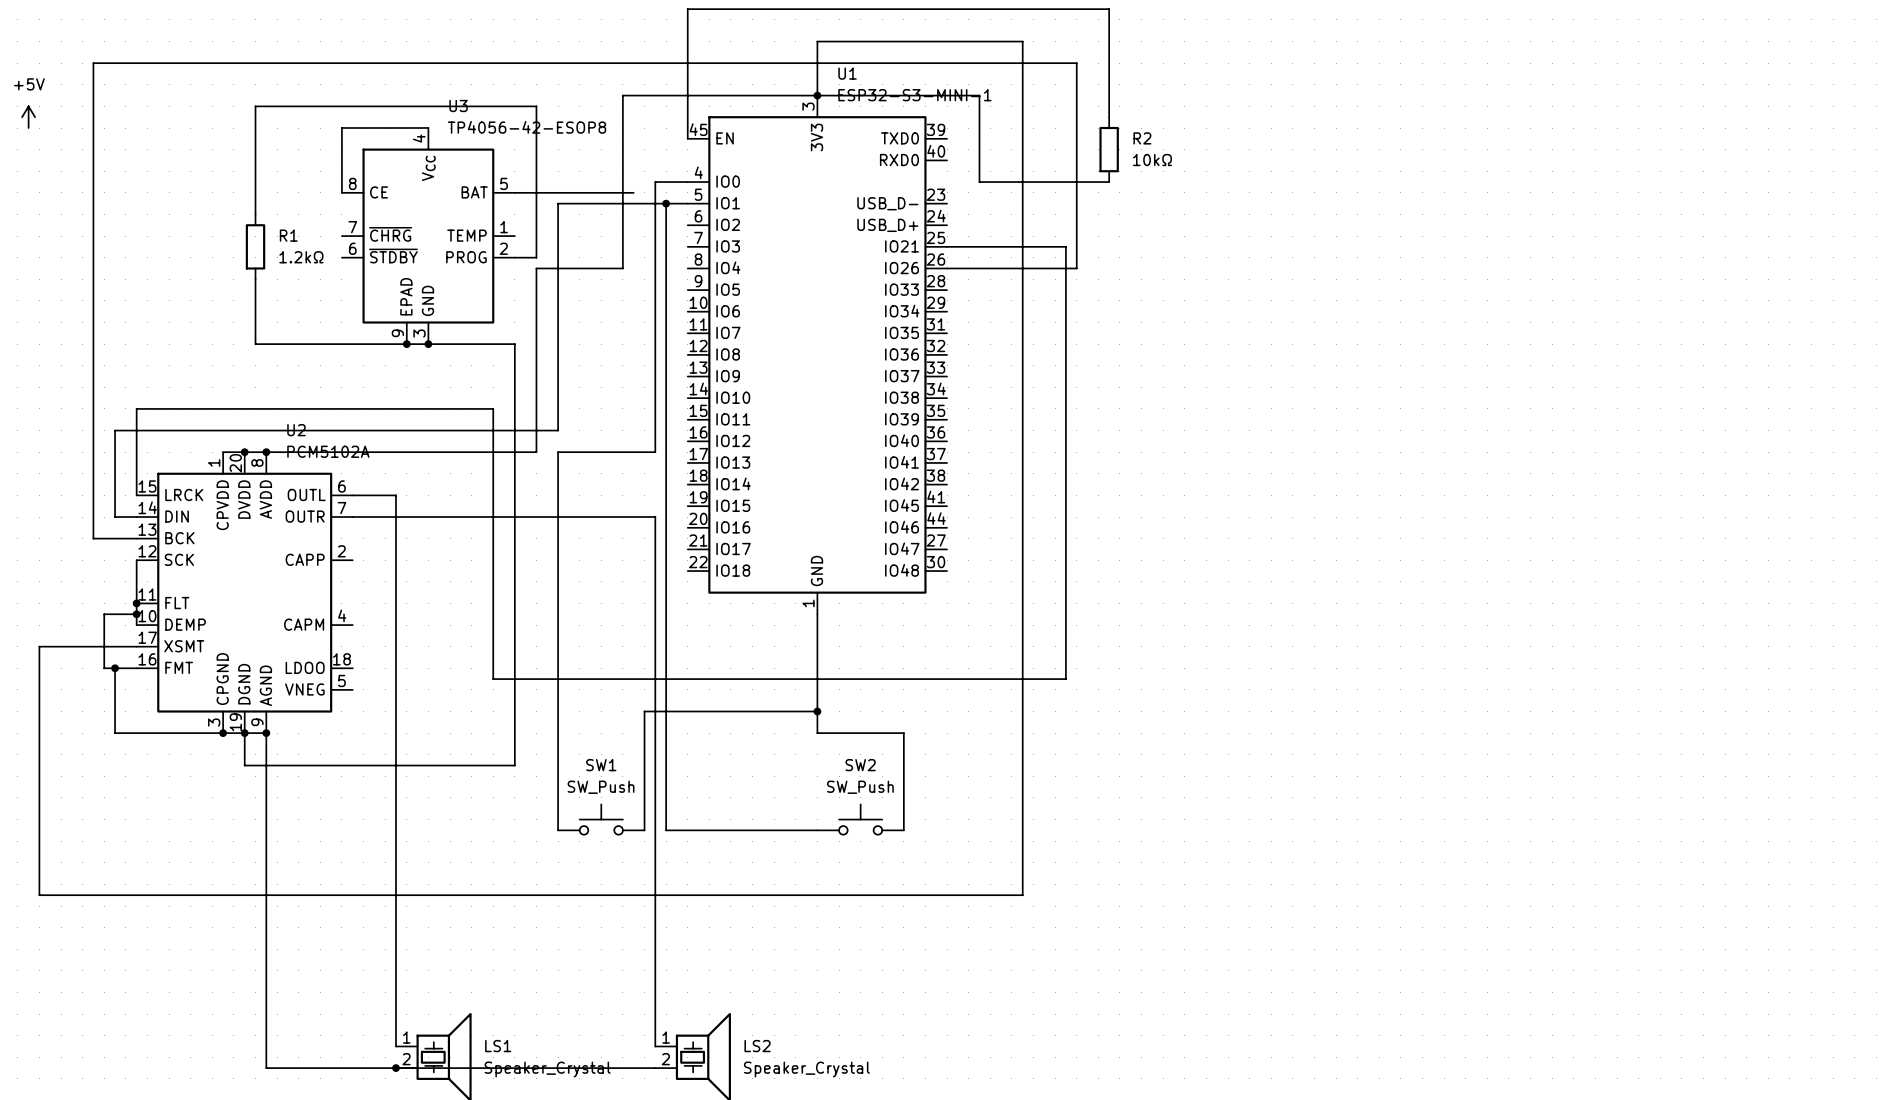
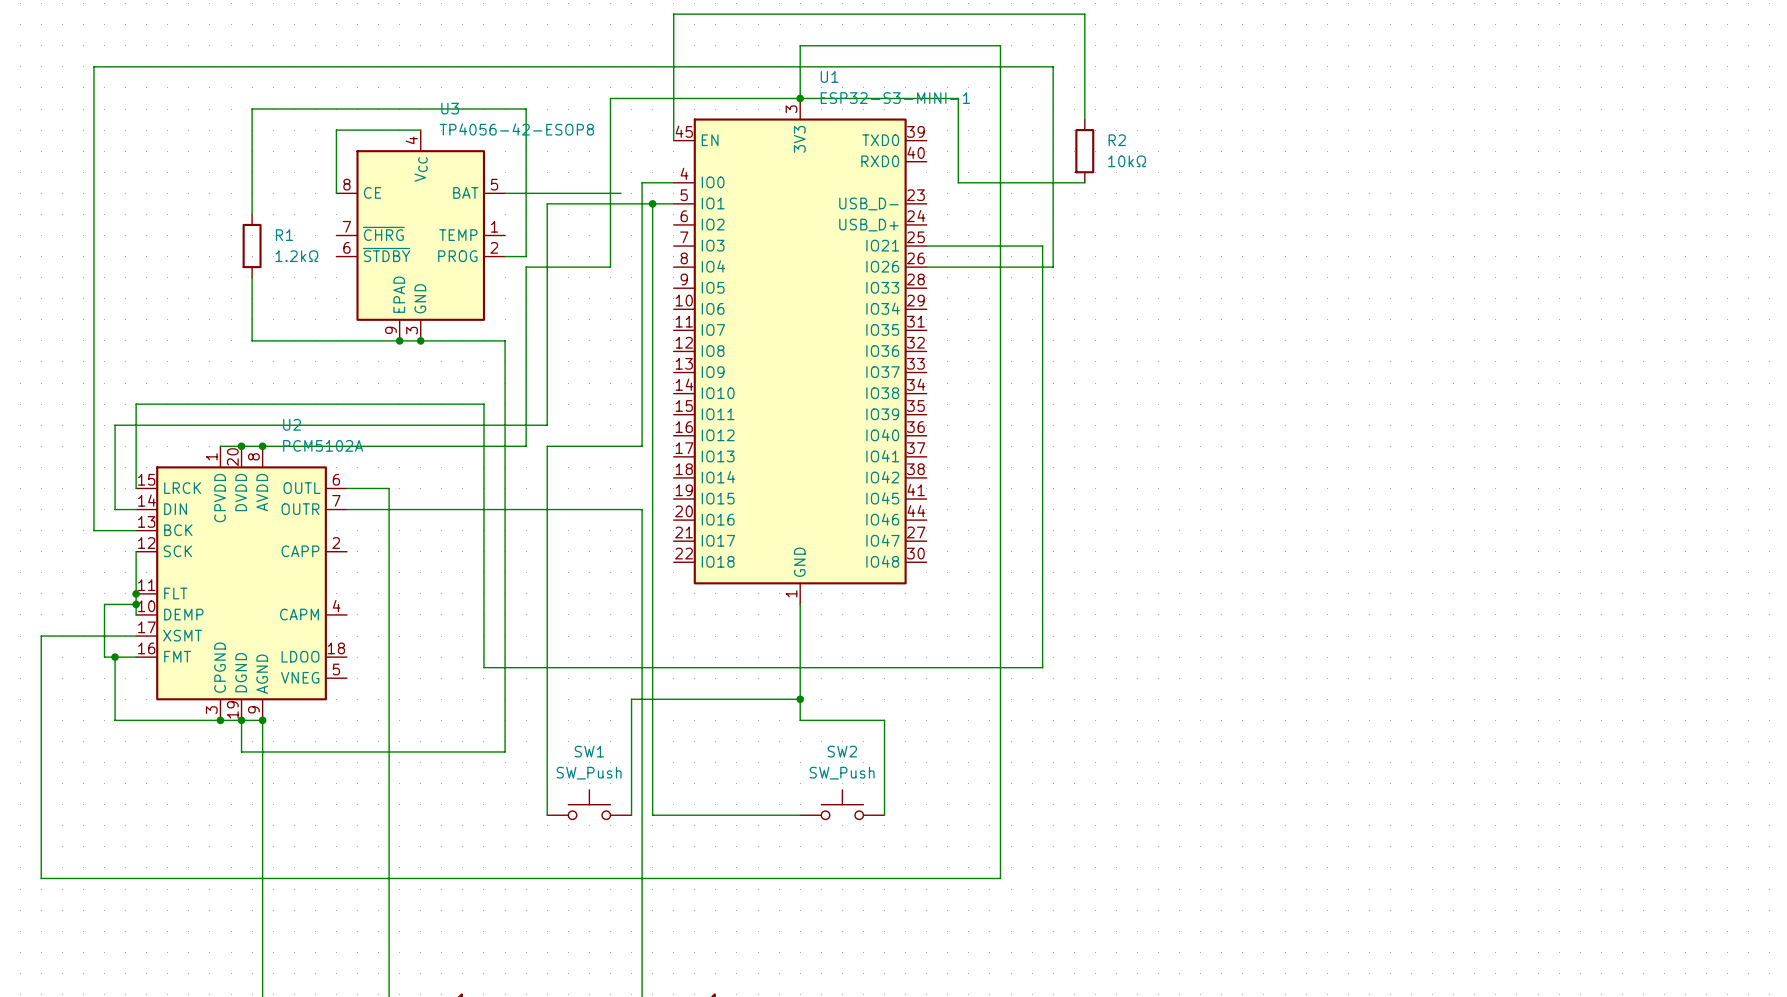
power symbol: +5V (28, 117) -> none

